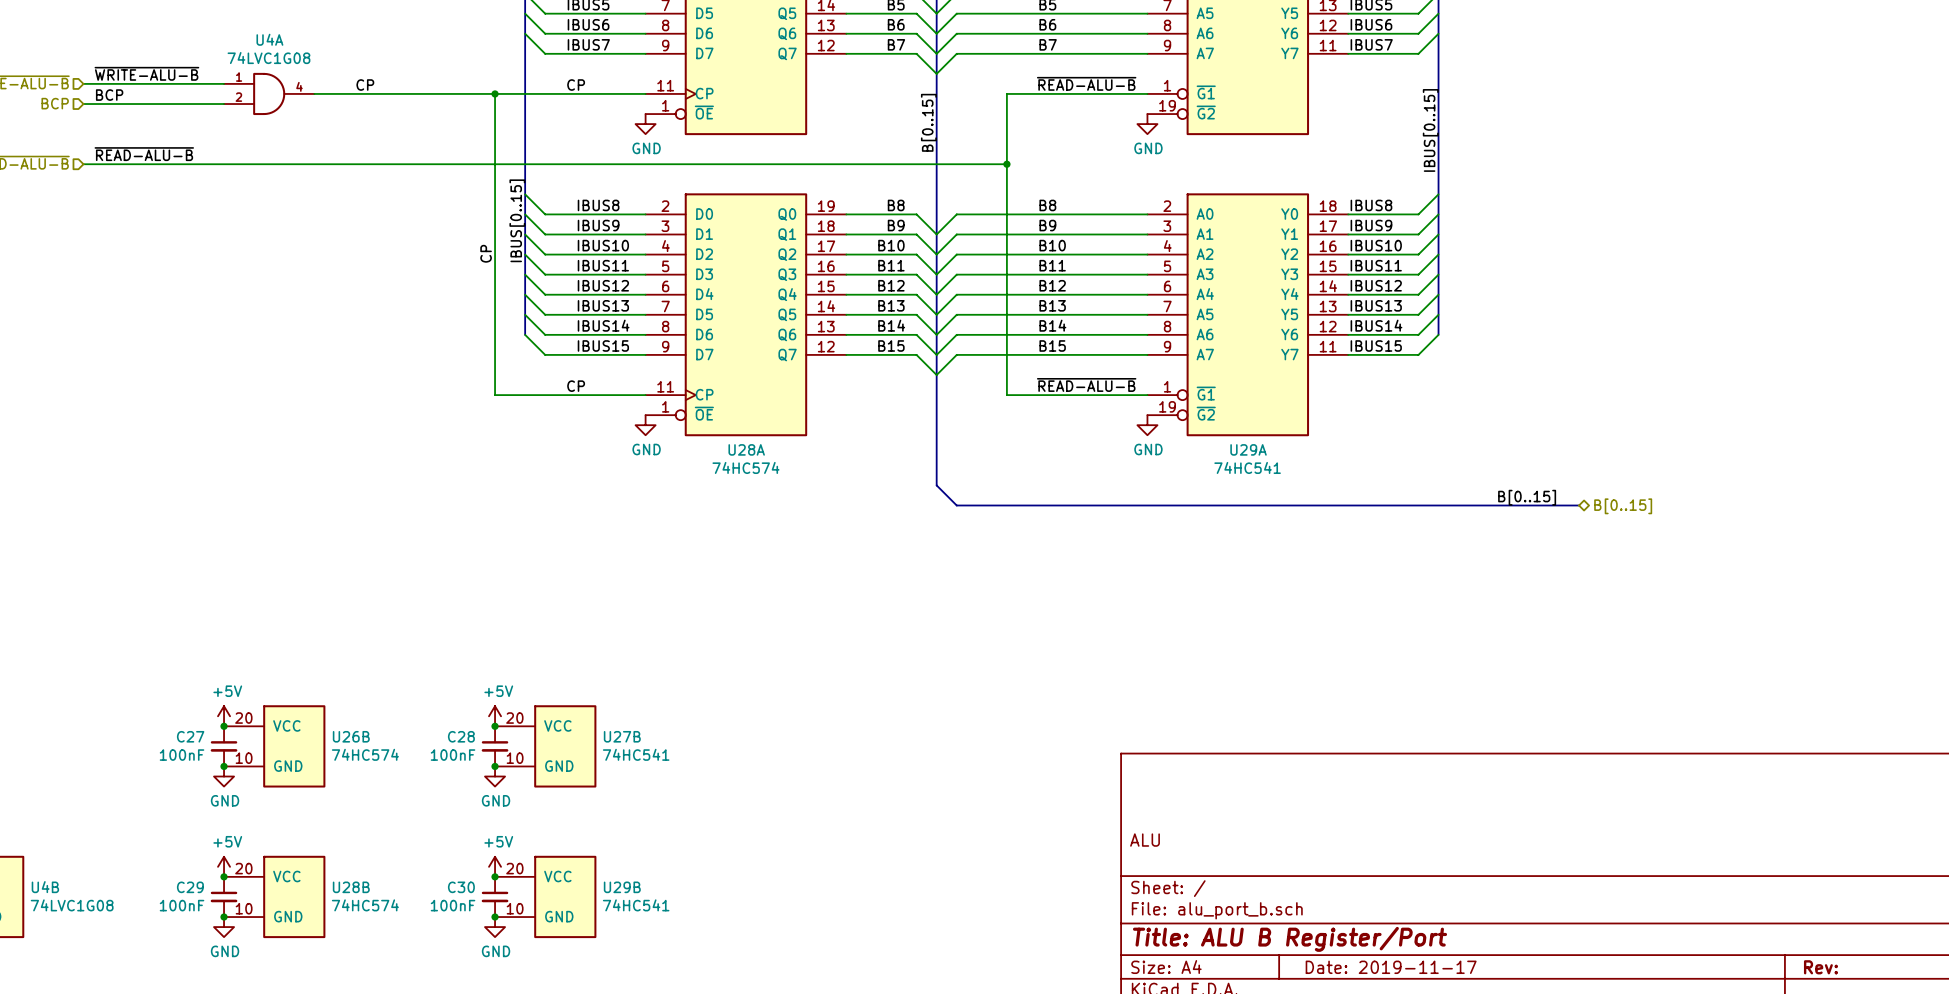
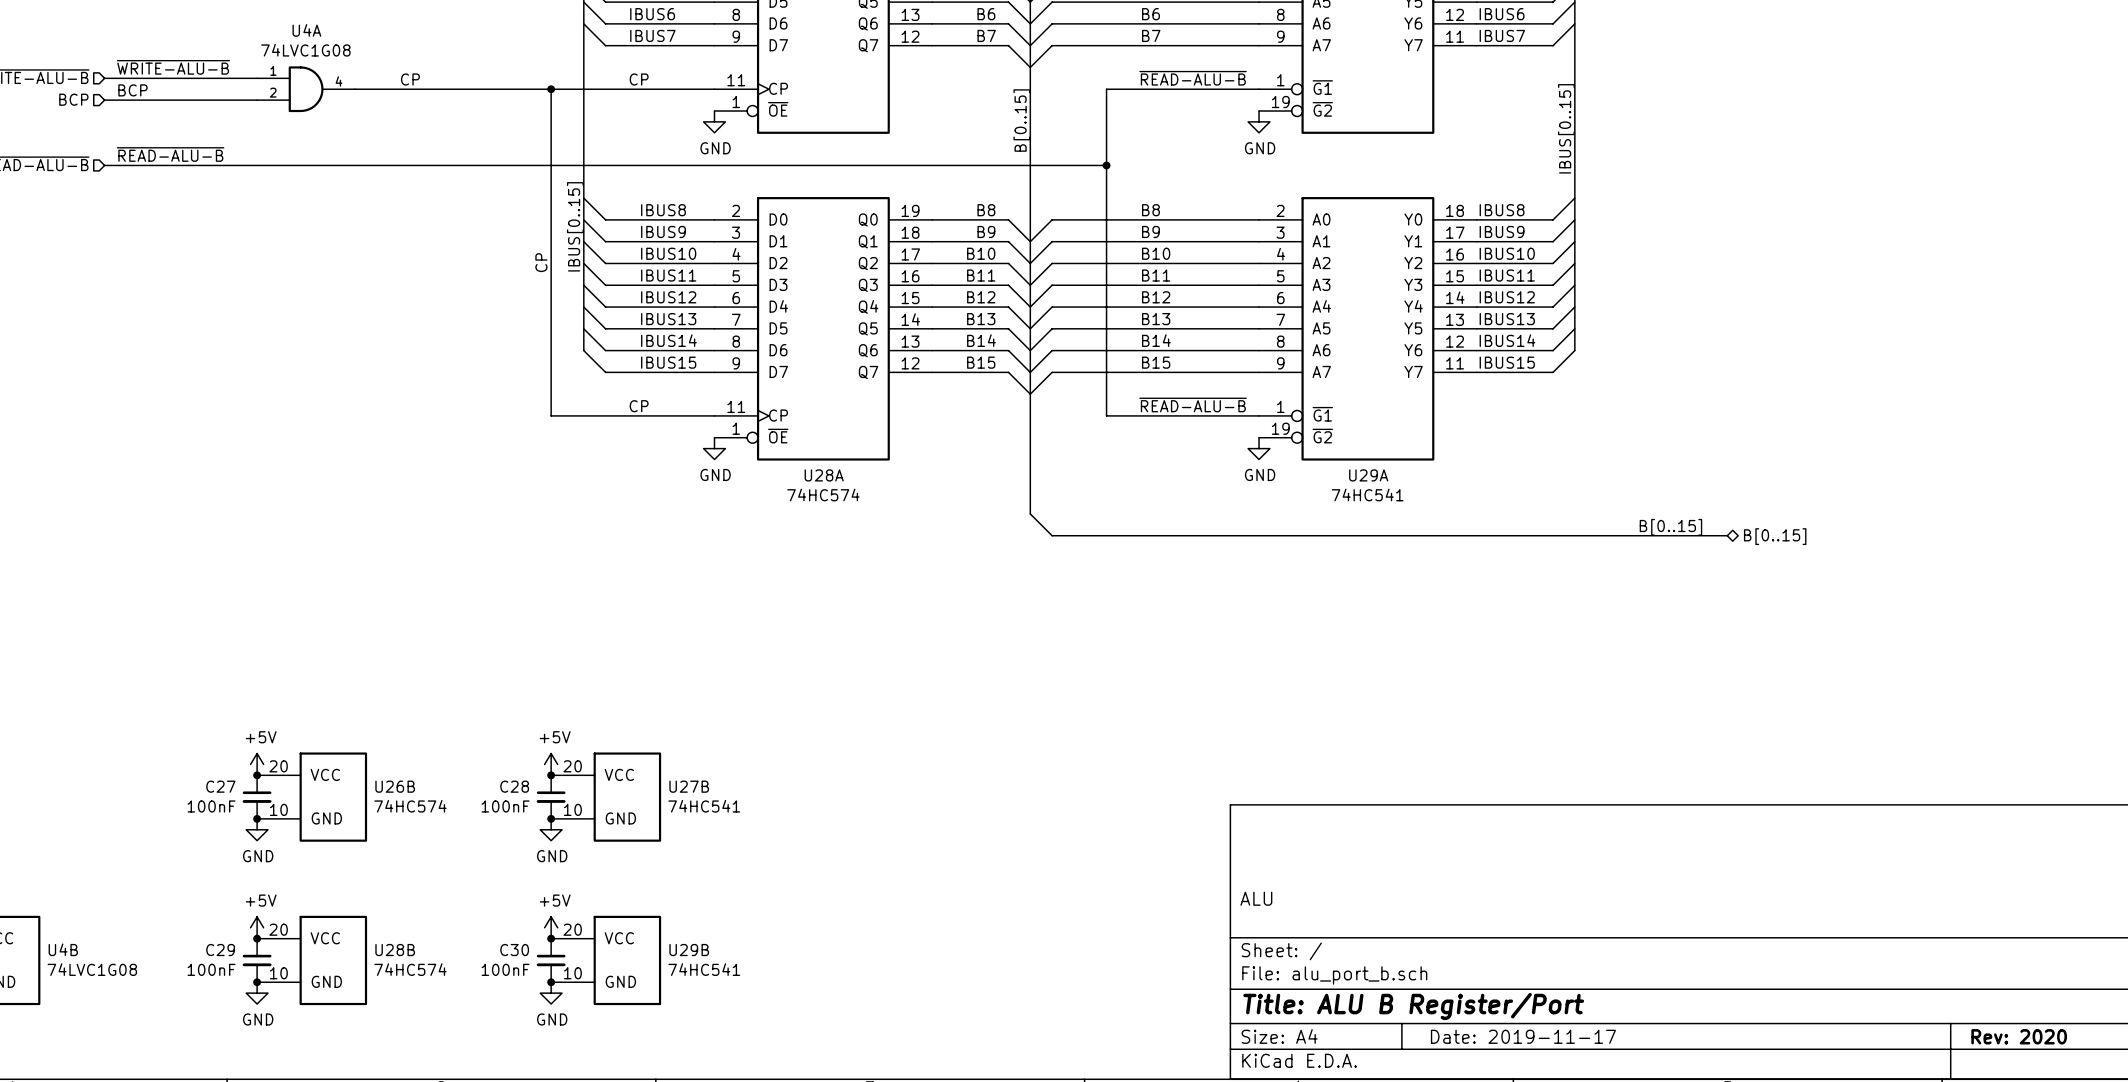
title block: Rev: (1820, 967) -> Rev: 2020 (2019, 1036)

